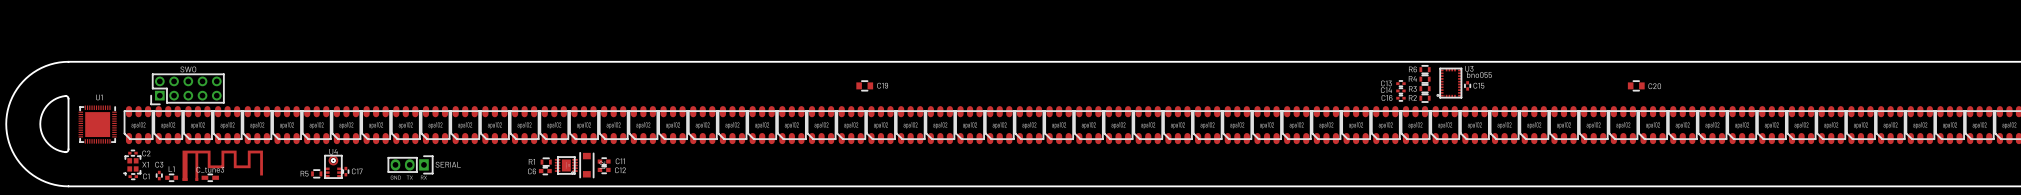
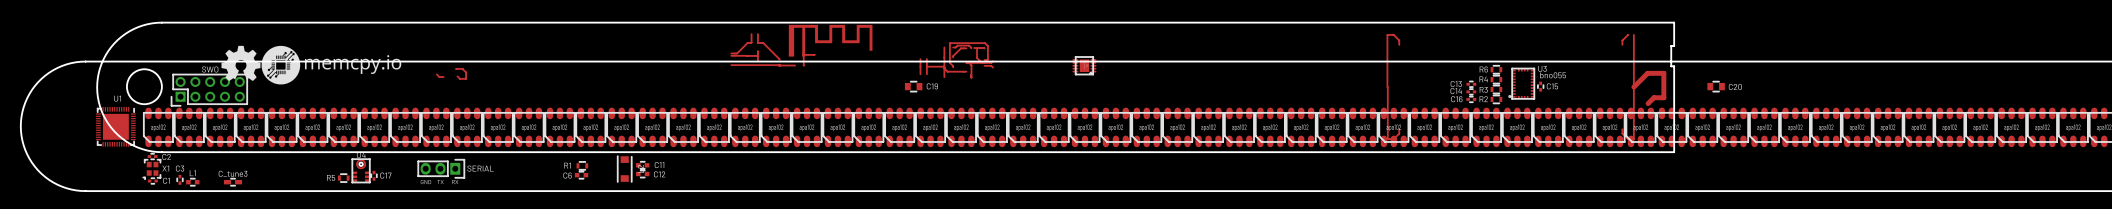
board edge: none -> (161, 22) (1674, 22) (1674, 45) (1671, 45) (1671, 66) (1674, 66) (1674, 152) (157, 151) (133, 145) (114, 131) (101, 111) (97, 87) (101, 63) (108, 50) (117, 39) (138, 27) (161, 22)
track: none -> (751, 34) (751, 42) (747, 42) (737, 53) (731, 53)
track: none -> (757, 34) (757, 42) (763, 42) (779, 59)
track: none -> (1628, 34) (1622, 40) (1622, 44)
track: none -> (1633, 34) (1634, 87)
part: none -> (830, 40)
track: none -> (1399, 44) (1399, 40) (1393, 34) (1387, 35) (1387, 87)
drawing: none -> [221, 45, 402, 85]
track: none -> (944, 47) (944, 77)
track: none -> (953, 47) (969, 45) (971, 48)
track: none -> (974, 48) (984, 48)
track: none -> (977, 48) (977, 57) (982, 62)
track: none -> (966, 48) (960, 48) (953, 57)
track: none -> (757, 51) (757, 60)
track: none -> (757, 55) (731, 55)
track: none -> (814, 54) (803, 54) (803, 65)
track: none -> (920, 59) (920, 74)
track: none -> (926, 59) (926, 74)
track: none -> (984, 60) (987, 59) (987, 46) (984, 43) (950, 43) (949, 62) (953, 67)
track: none -> (993, 61) (991, 62) (966, 62)
track: none -> (969, 62) (971, 65) (971, 77) (971, 74)
track: none -> (780, 65) (731, 65)
track: none -> (779, 65) (795, 65)
track: none -> (984, 65) (993, 67)
track: none -> (926, 66) (944, 67)
round board edge: none -> [126, 68, 163, 105]
track: none -> (944, 68) (947, 71) (966, 71)
track: none -> (456, 69) (462, 68) (466, 72) (465, 78) (460, 78) (457, 76)
track: none -> (436, 74) (443, 76)
track: none -> (1387, 87) (1387, 139) (1393, 139) (1399, 133) (1399, 129)
board edge: (65, 95) (68, 98) (68, 149) (65, 152) (56, 149) (48, 144) (41, 133) (40, 124) (41, 114) (46, 106) (56, 98) (65, 95) -> none
track: none -> (1648, 103) (1653, 97) (1663, 97) (1663, 73) (1647, 73) (1633, 87) (1633, 139) (1628, 139) (1622, 133) (1622, 129)
part: (222, 165) -> none
part position: (566, 165) -> (1084, 65)

